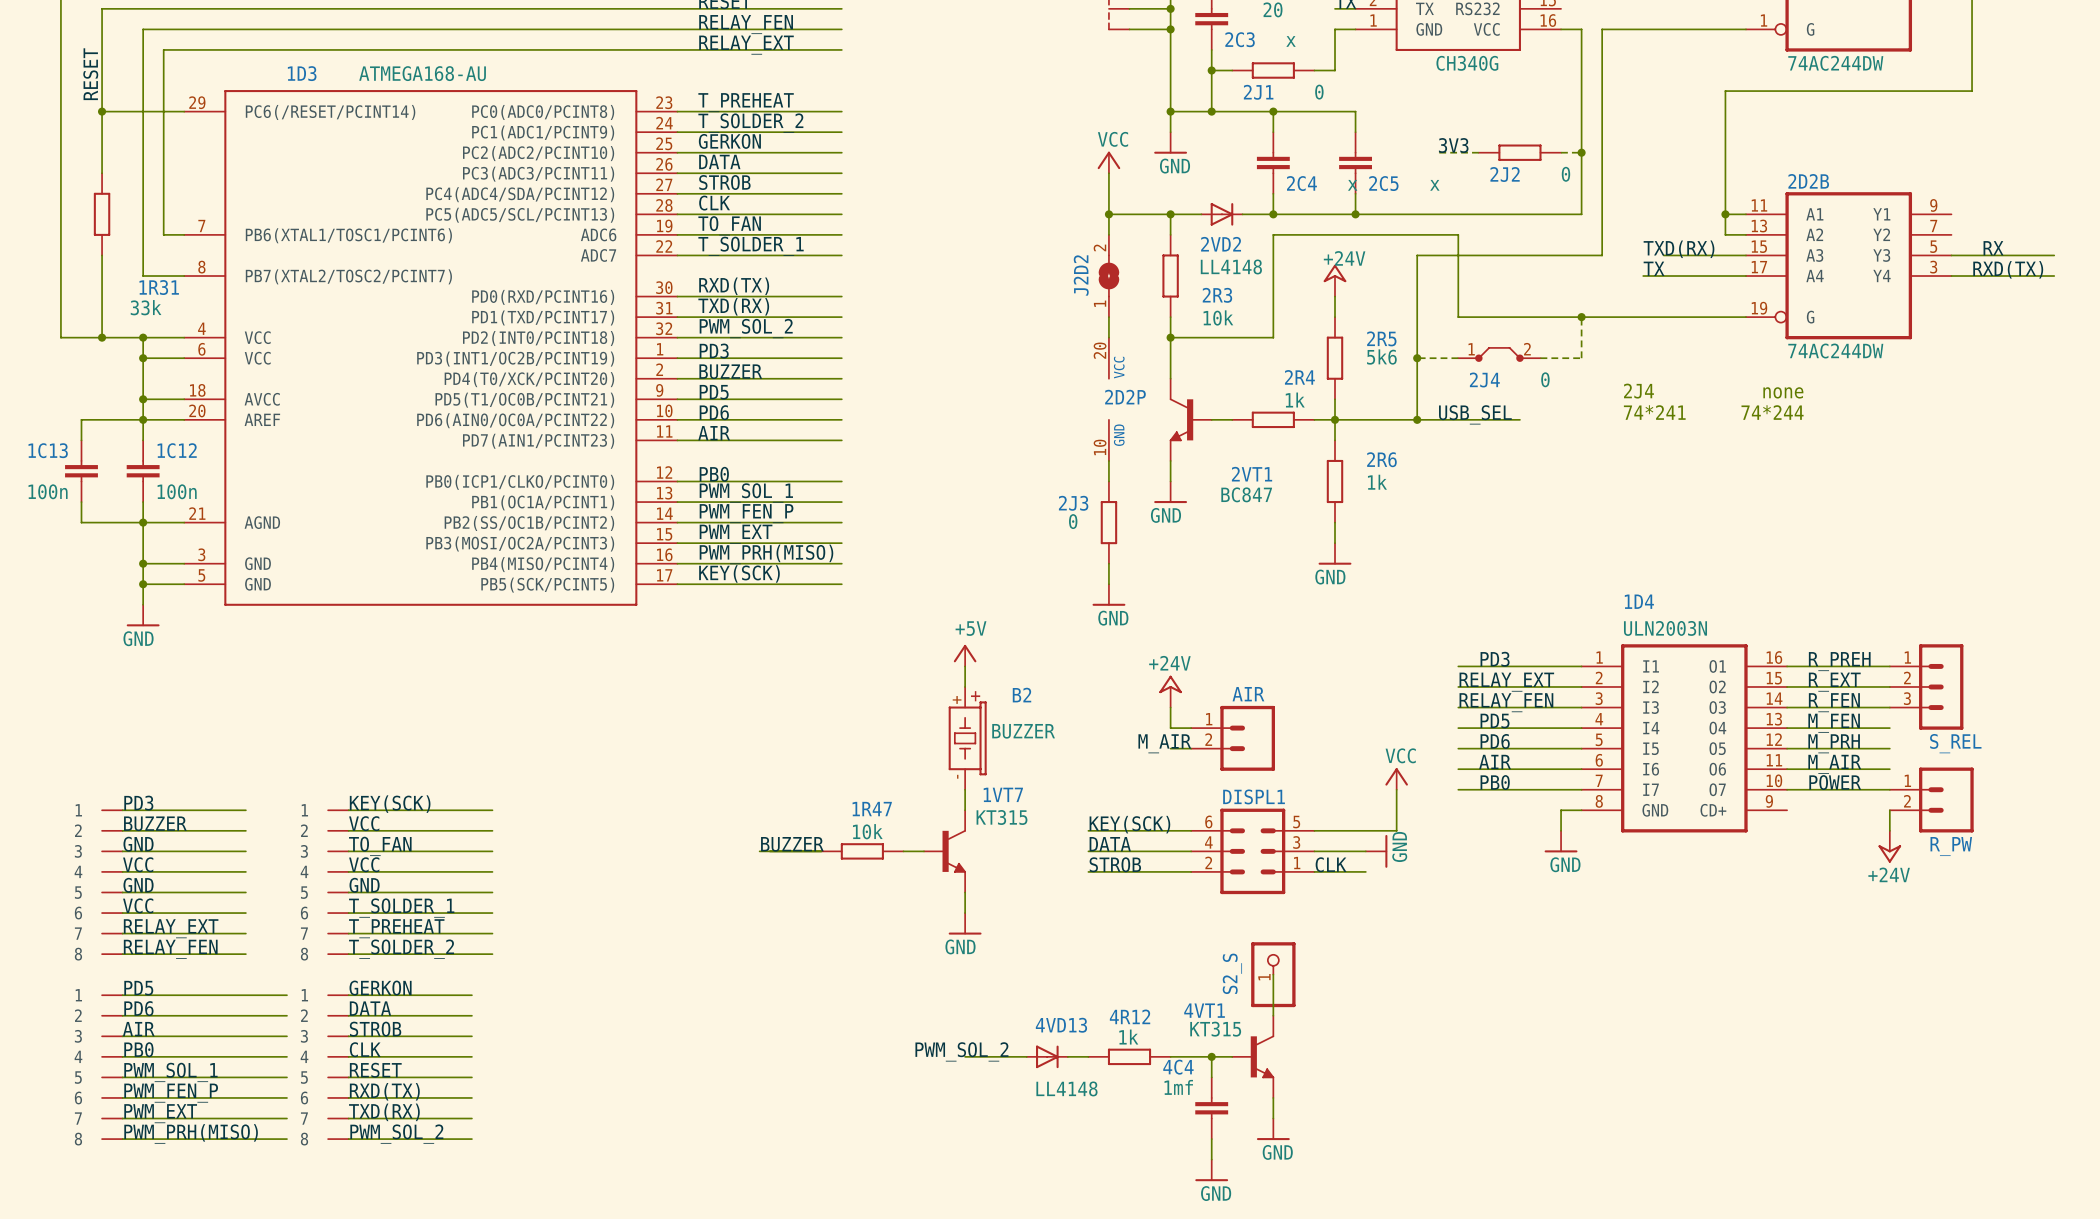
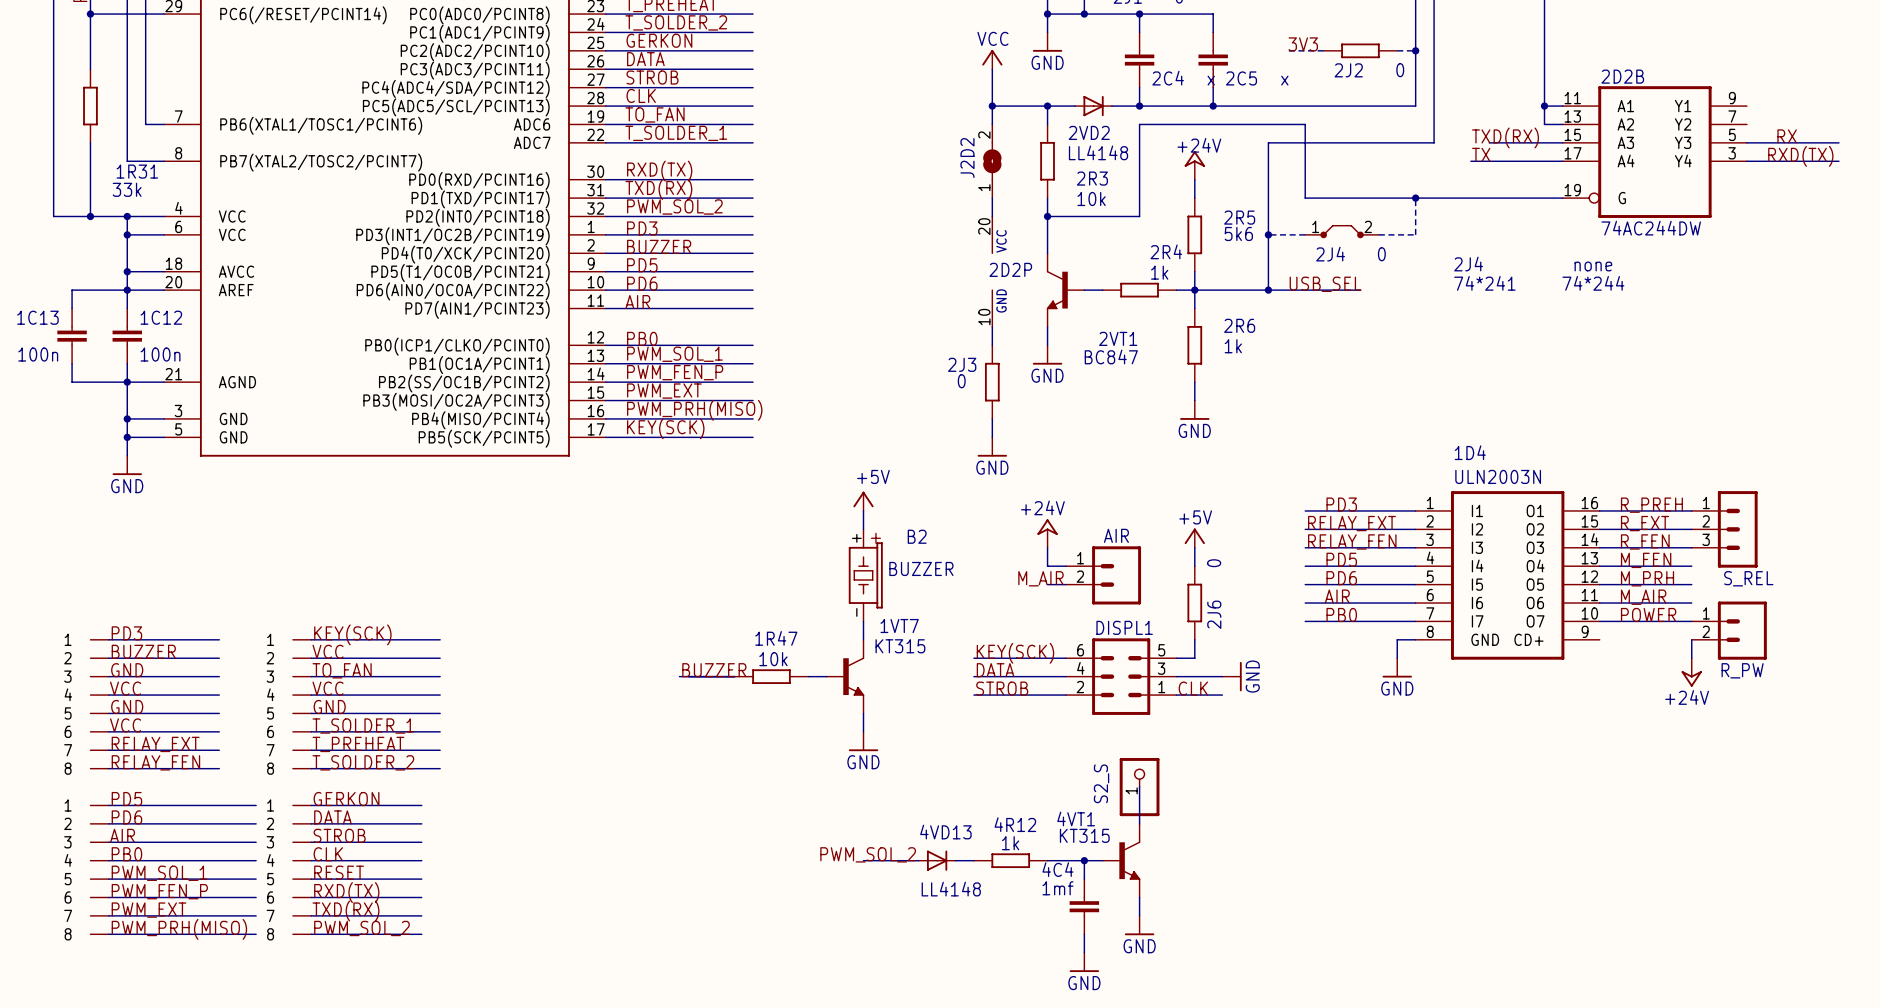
power symbol: none -> +5V (1194, 538)
wire: none -> (1194, 547) (1194, 566)
2J6: none -> 0 (1194, 603)
power symbol: VCC (1396, 778) -> none
wire: (1396, 789) (1396, 830) (1335, 830) -> (1194, 639) (1194, 658)

